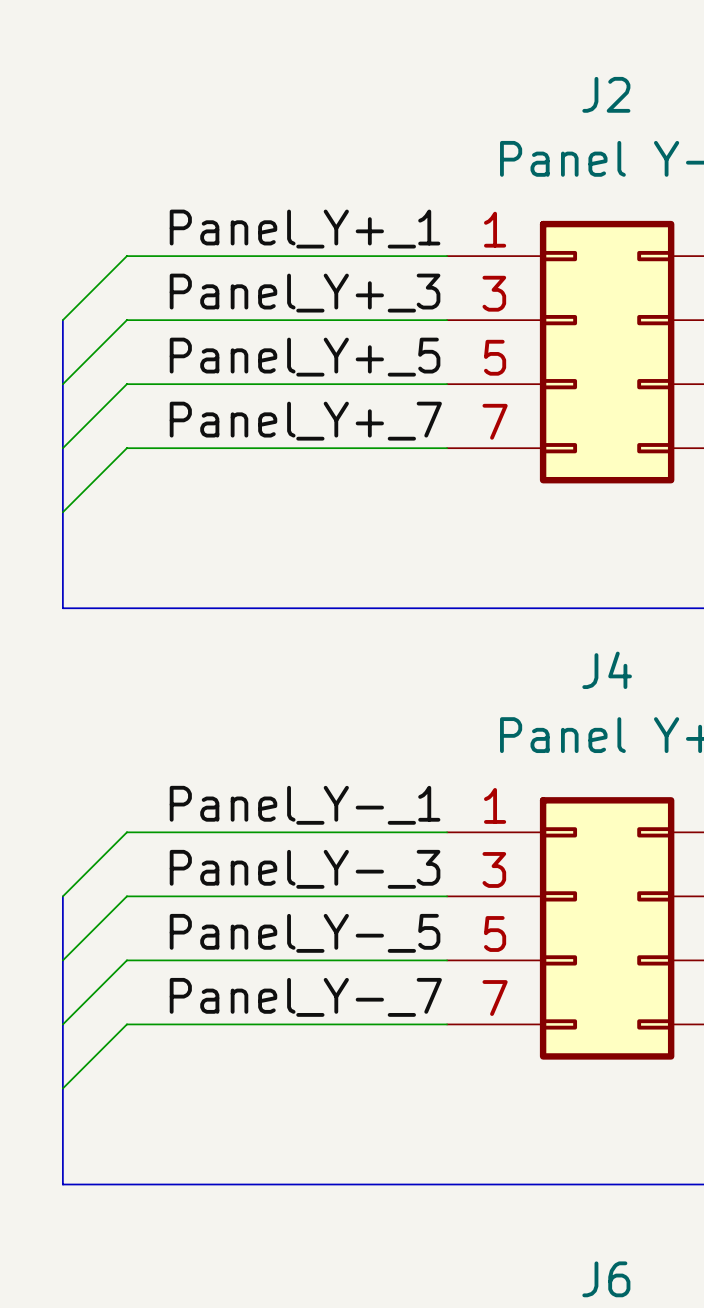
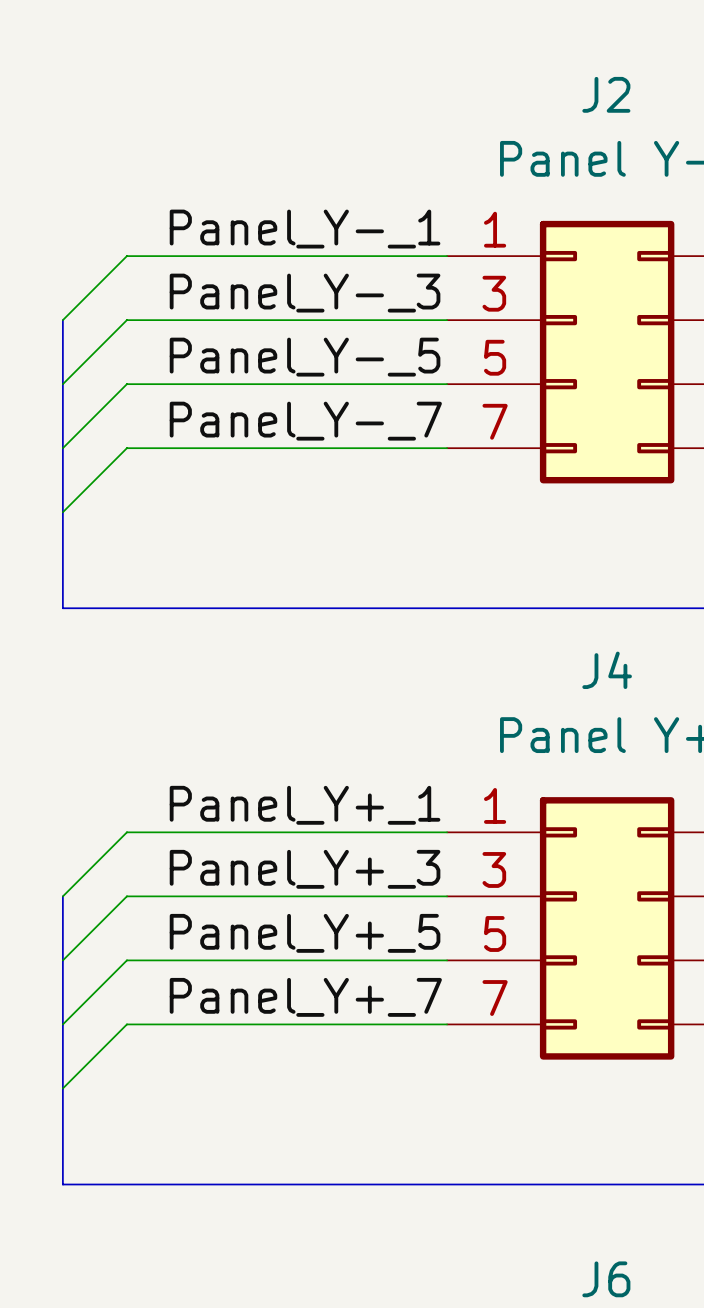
label: Panel_Y+_1 (305, 229) -> Panel_Y-_1 (305, 229)
label: Panel_Y+_3 (305, 293) -> Panel_Y-_3 (305, 293)
label: Panel_Y+_5 (305, 357) -> Panel_Y-_5 (305, 357)
label: Panel_Y+_7 (305, 421) -> Panel_Y-_7 (305, 421)
label: Panel_Y-_1 (305, 805) -> Panel_Y+_1 (305, 805)
label: Panel_Y-_3 (305, 869) -> Panel_Y+_3 (305, 869)
label: Panel_Y-_5 (305, 933) -> Panel_Y+_5 (305, 933)
label: Panel_Y-_7 (305, 997) -> Panel_Y+_7 (305, 997)

